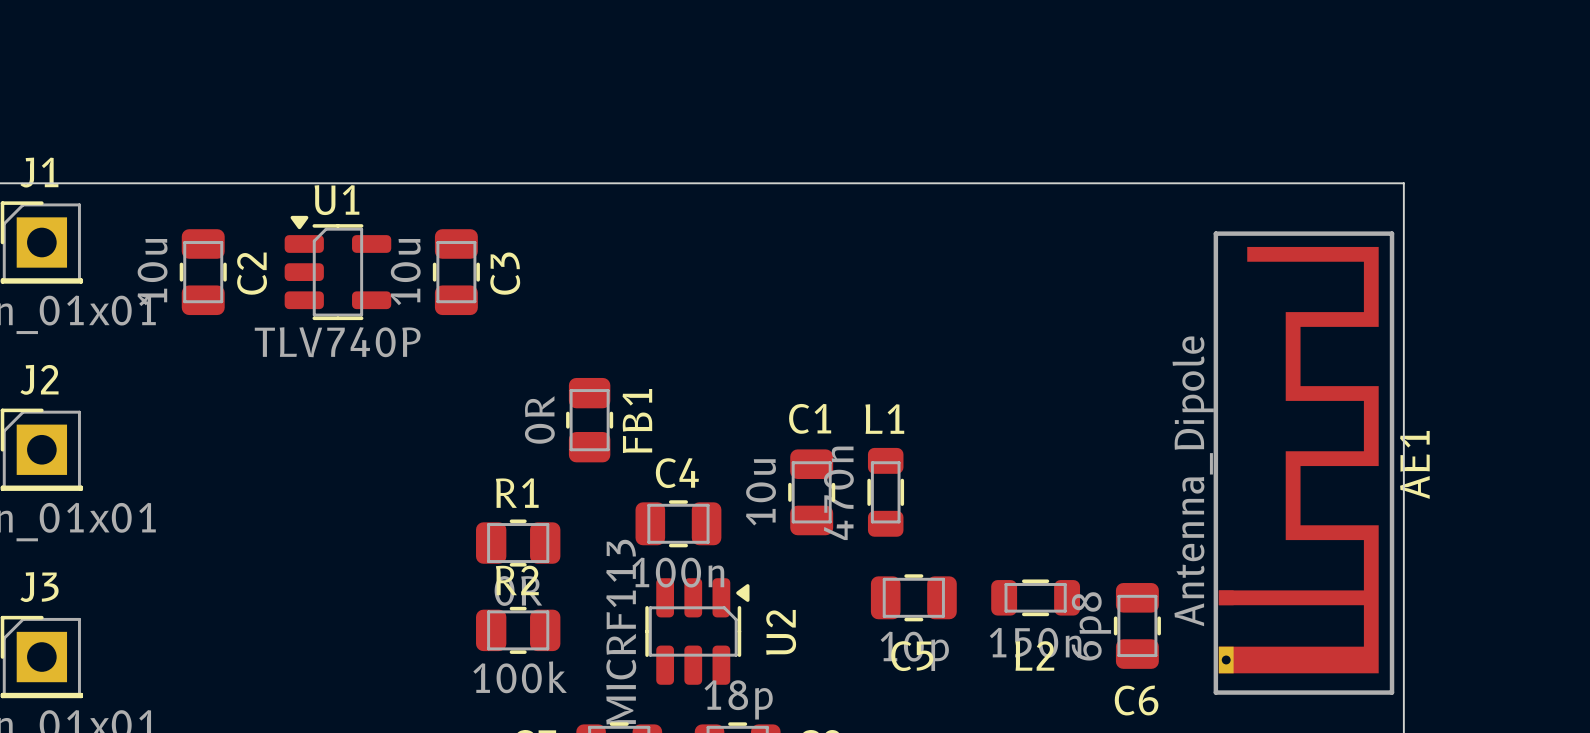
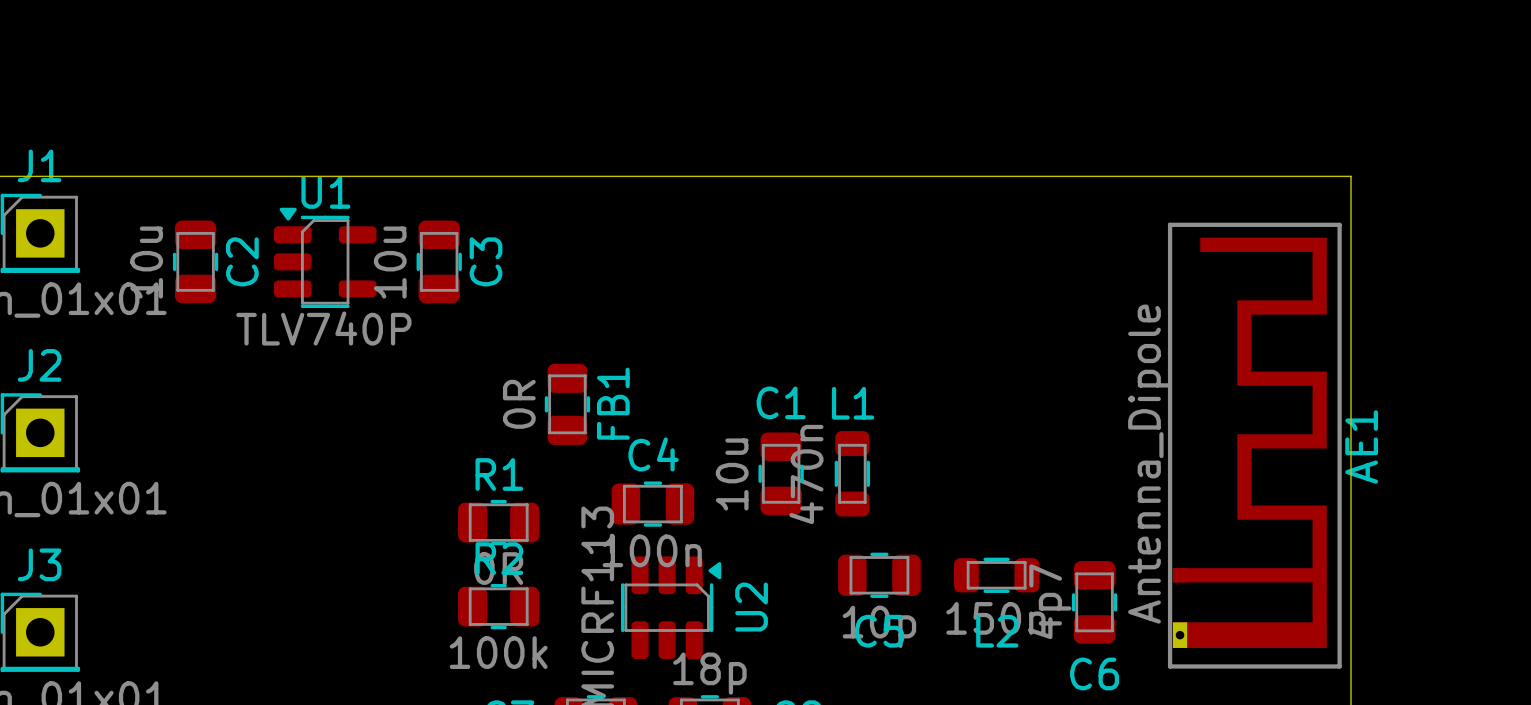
C6 value: 6p8 (1091, 626) -> 4p7 (1049, 601)

